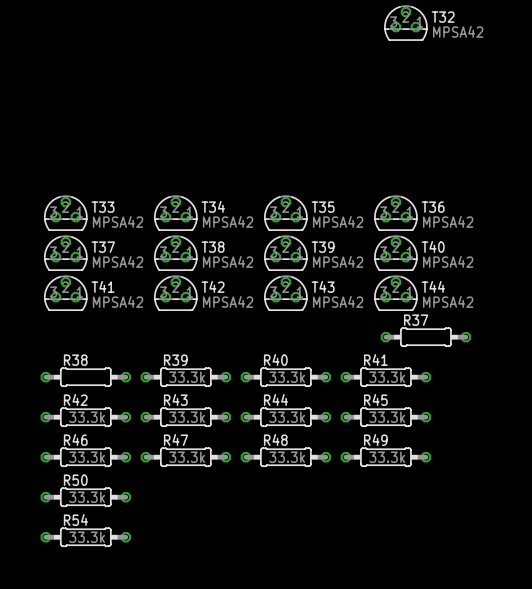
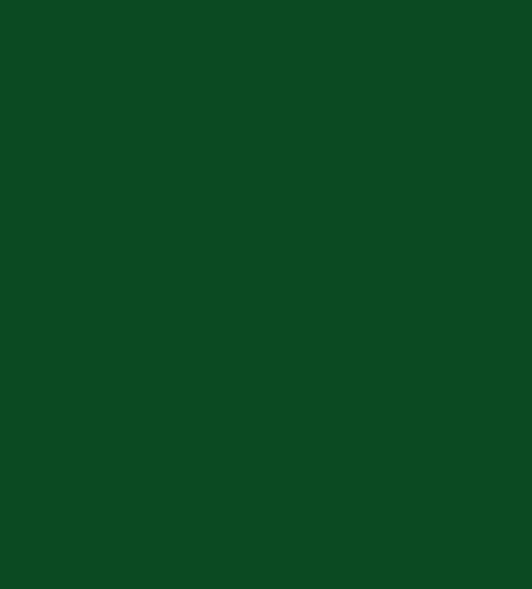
T32: MPSA42 (405, 23) -> none
T33: MPSA42 (65, 213) -> none
T34: MPSA42 (175, 213) -> none
T35: MPSA42 (285, 213) -> none
T36: MPSA42 (395, 213) -> none
T37: MPSA42 (65, 253) -> none
T38: MPSA42 (175, 253) -> none
T39: MPSA42 (285, 253) -> none
T40: MPSA42 (395, 253) -> none
T41: MPSA42 (65, 293) -> none
T42: MPSA42 (175, 293) -> none
T43: MPSA42 (285, 293) -> none
T44: MPSA42 (395, 293) -> none
R37: (425, 337) -> none
R38: (85, 377) -> none
R39: 33.3k (185, 377) -> none
R40: 33.3k (285, 377) -> none
R41: 33.3k (385, 377) -> none
R42: 33.3k (85, 417) -> none
R43: 33.3k (185, 417) -> none
R44: 33.3k (285, 417) -> none
R45: 33.3k (385, 417) -> none
R46: 33.3k (85, 457) -> none
R47: 33.3k (185, 457) -> none
R48: 33.3k (285, 457) -> none
R49: 33.3k (385, 457) -> none
R50: 33.3k (85, 497) -> none
R54: 33.3k (85, 537) -> none

